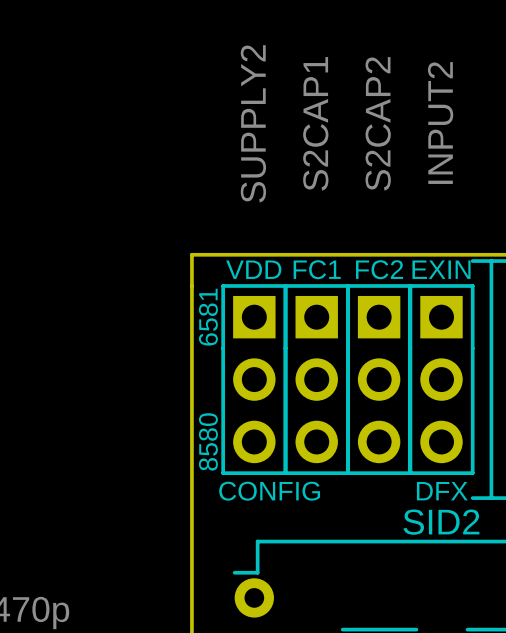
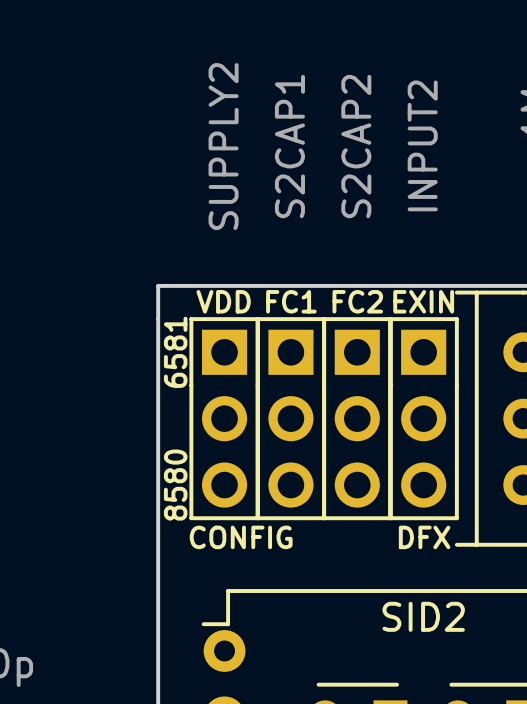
part value position: SID2 (441, 522) -> SID2 (423, 616)

